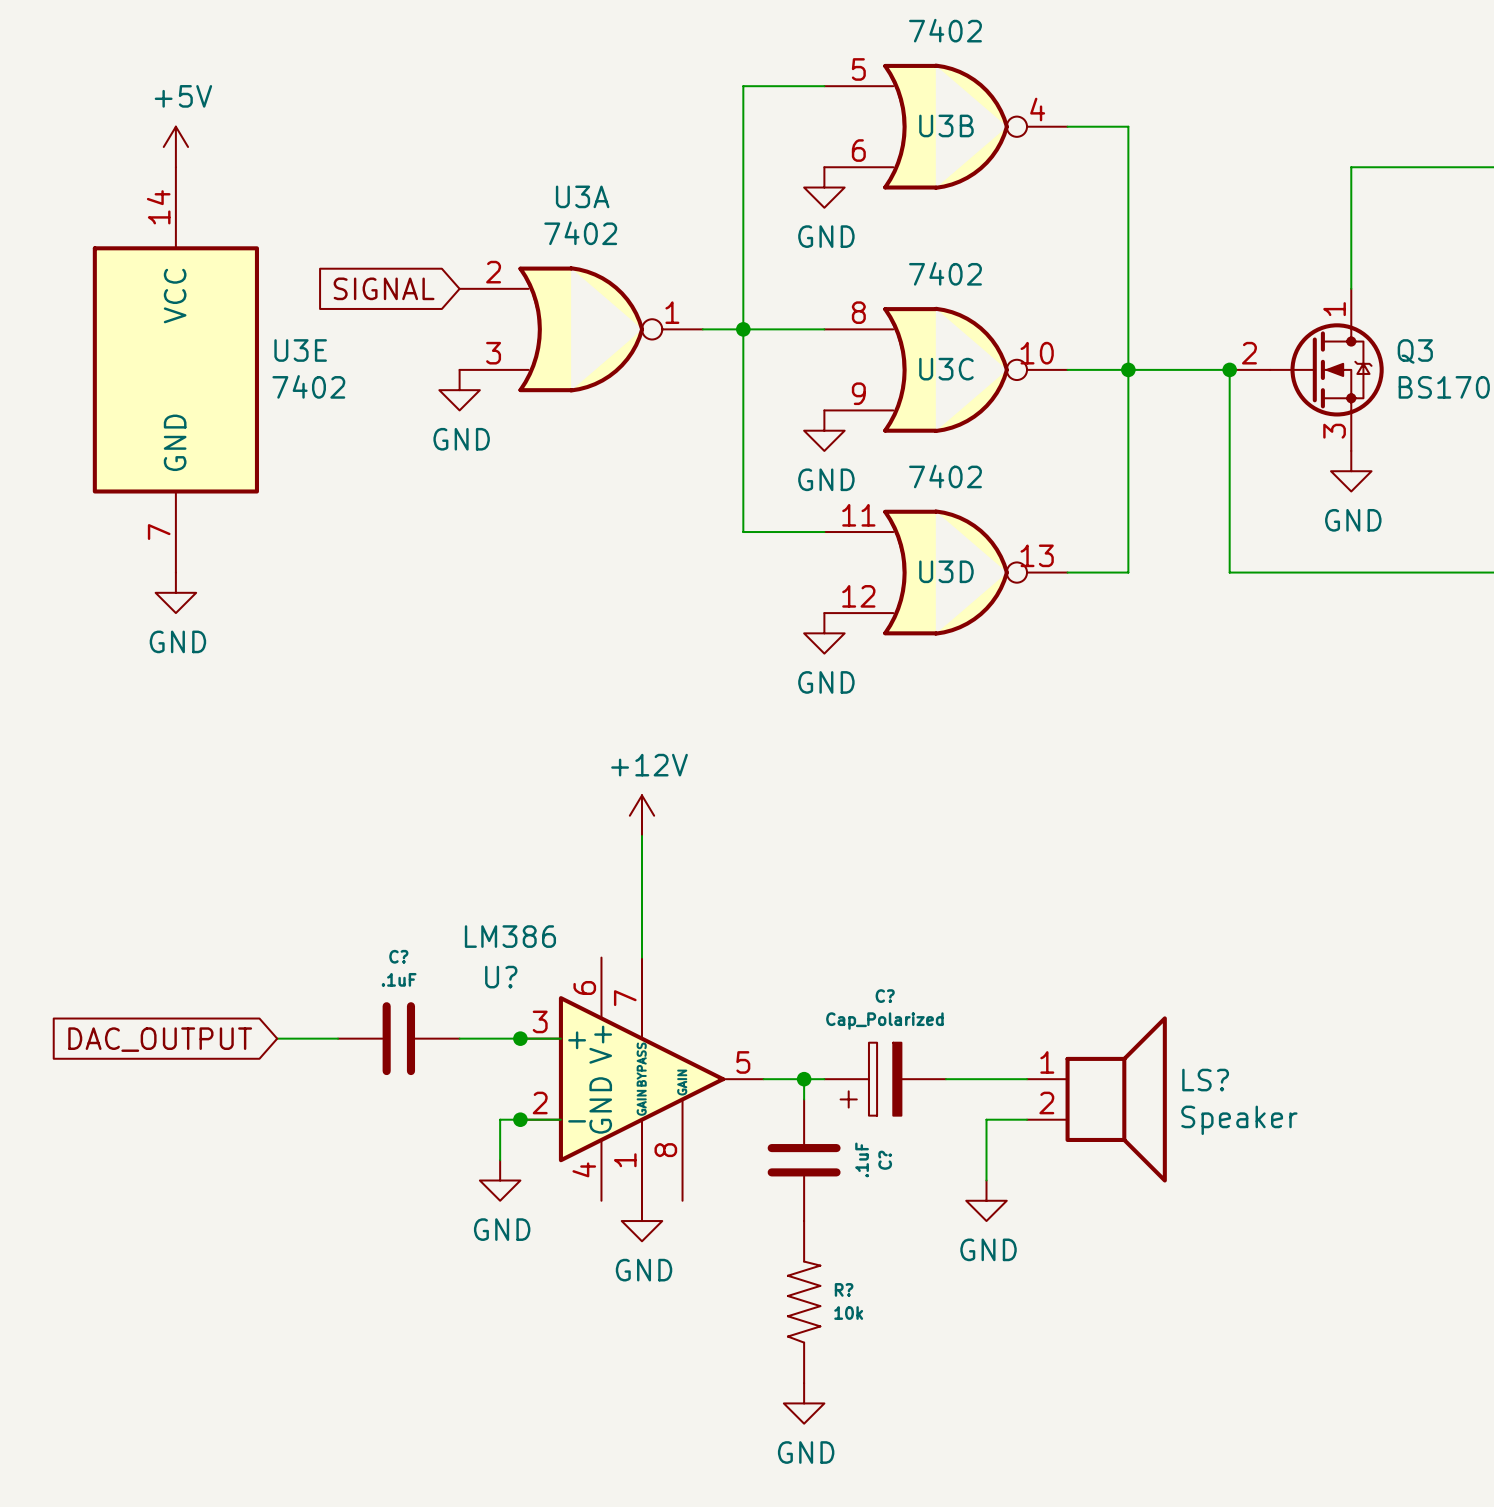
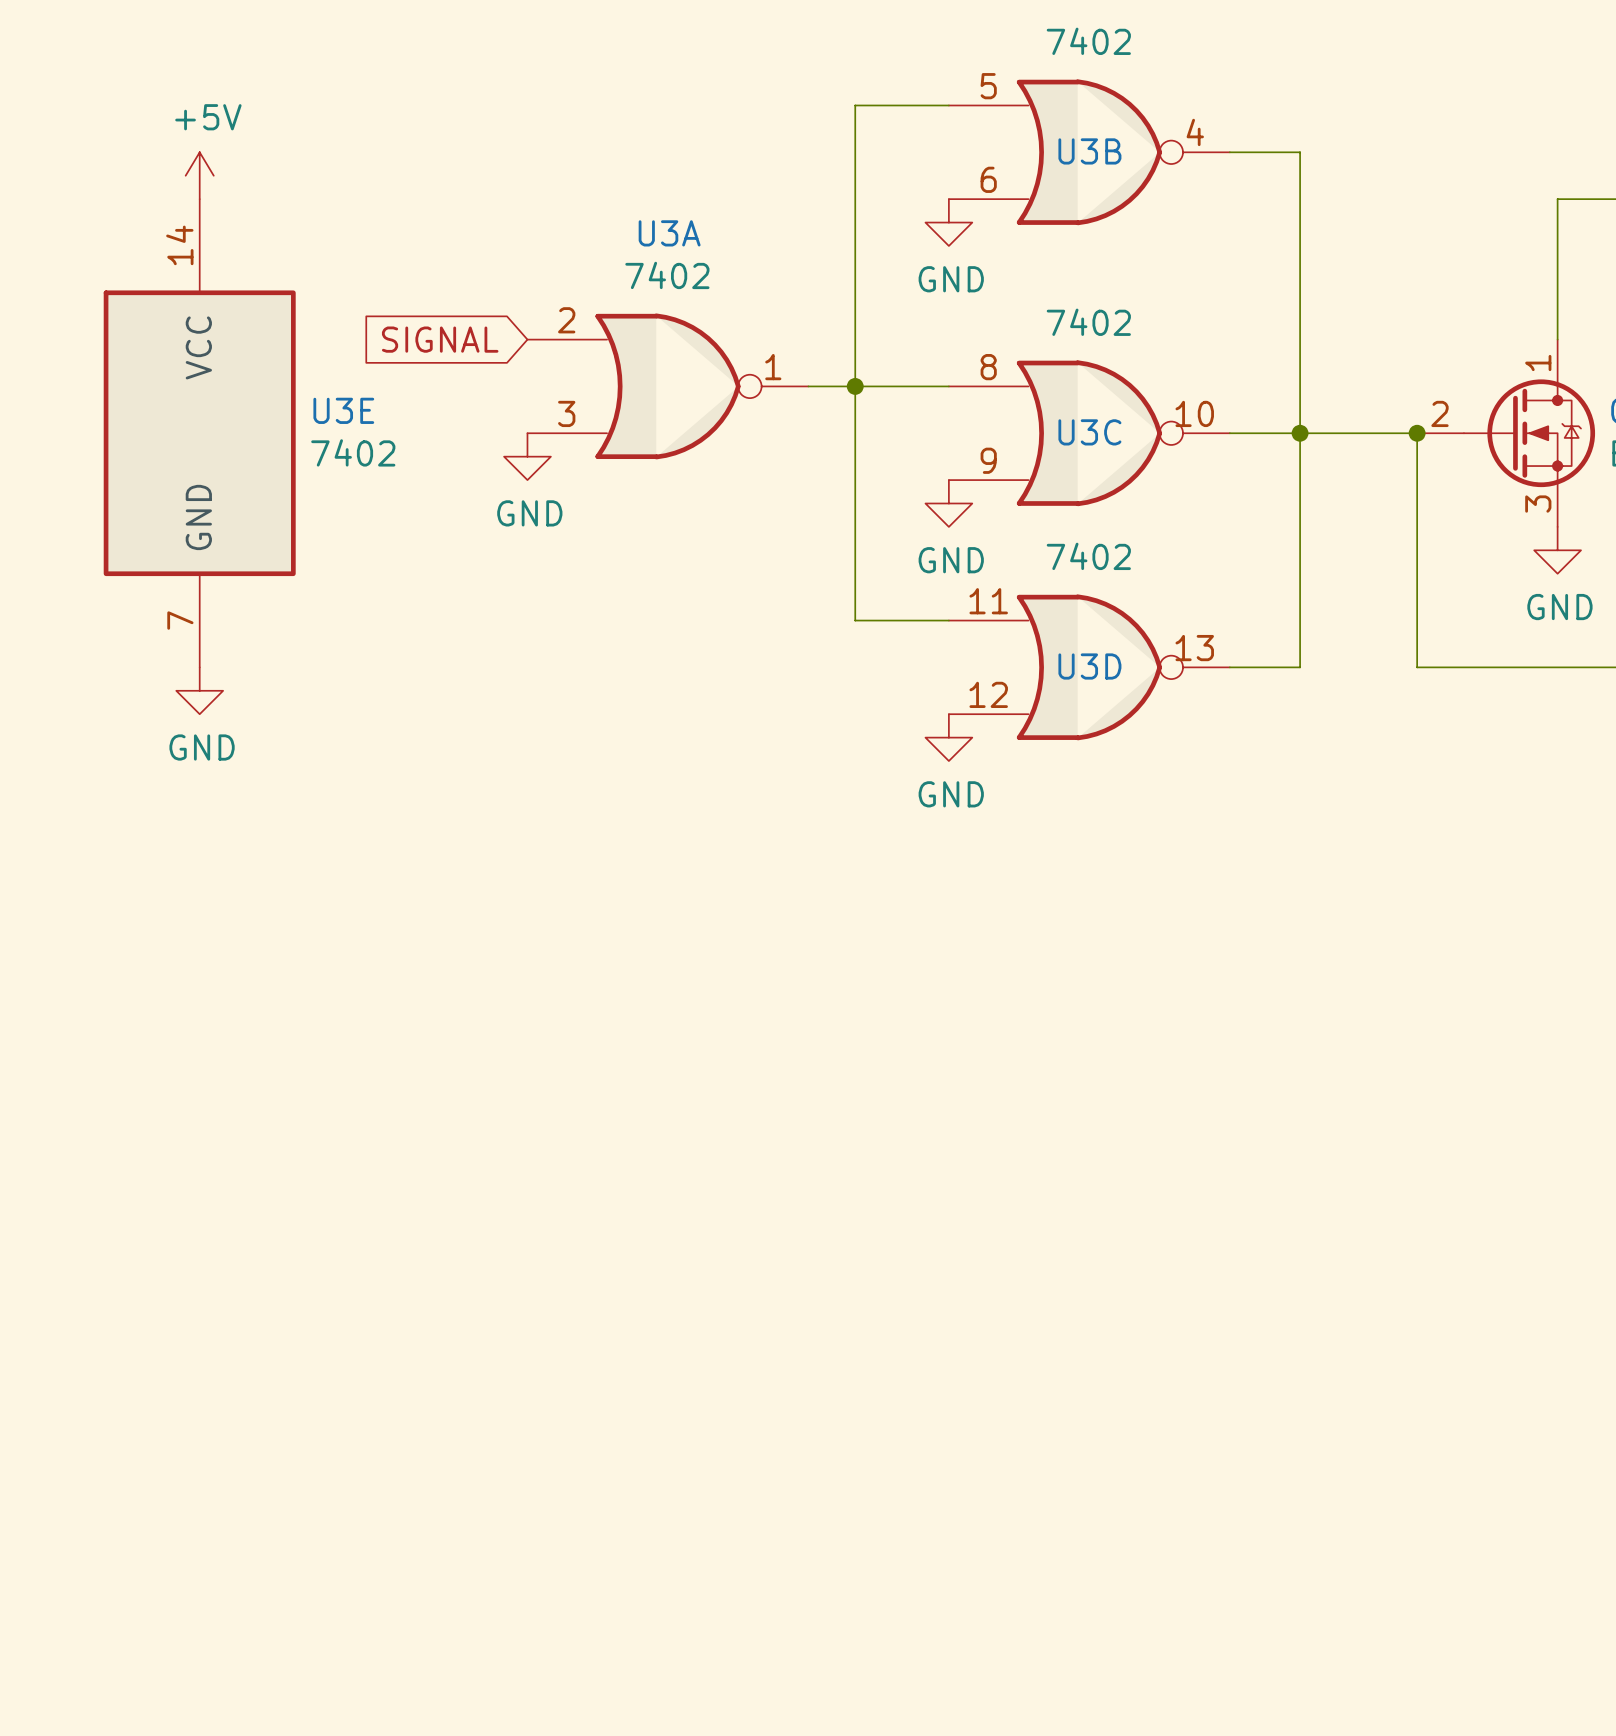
power symbol: +12V (642, 815) -> none
wire: (642, 835) (642, 957) -> none
wire: (277, 1038) (338, 1038) -> none
C?: .1uF (398, 1038) -> none
wire: (459, 1038) (560, 1038) -> none
junction: (520, 1038) -> none
global label: DAC_OUTPUT (160, 1039) -> none
U?: LM386 (642, 1079) -> none
wire: (763, 1079) (824, 1079) -> none
wire: (804, 1079) (804, 1099) -> none
junction: (804, 1079) -> none
C?: Cap_Polarized (885, 1079) -> none
wire: (945, 1079) (1027, 1079) -> none
LS?: Speaker (1096, 1099) -> none
junction: (520, 1119) -> none
wire: (560, 1119) (500, 1119) (500, 1160) -> none
wire: (1027, 1119) (986, 1119) (986, 1180) -> none
C?: .1uF (804, 1160) -> none
power symbol: GND (500, 1180) -> none
power symbol: GND (986, 1200) -> none
power symbol: GND (642, 1221) -> none
R?: 10k (804, 1302) -> none
power symbol: GND (804, 1403) -> none

